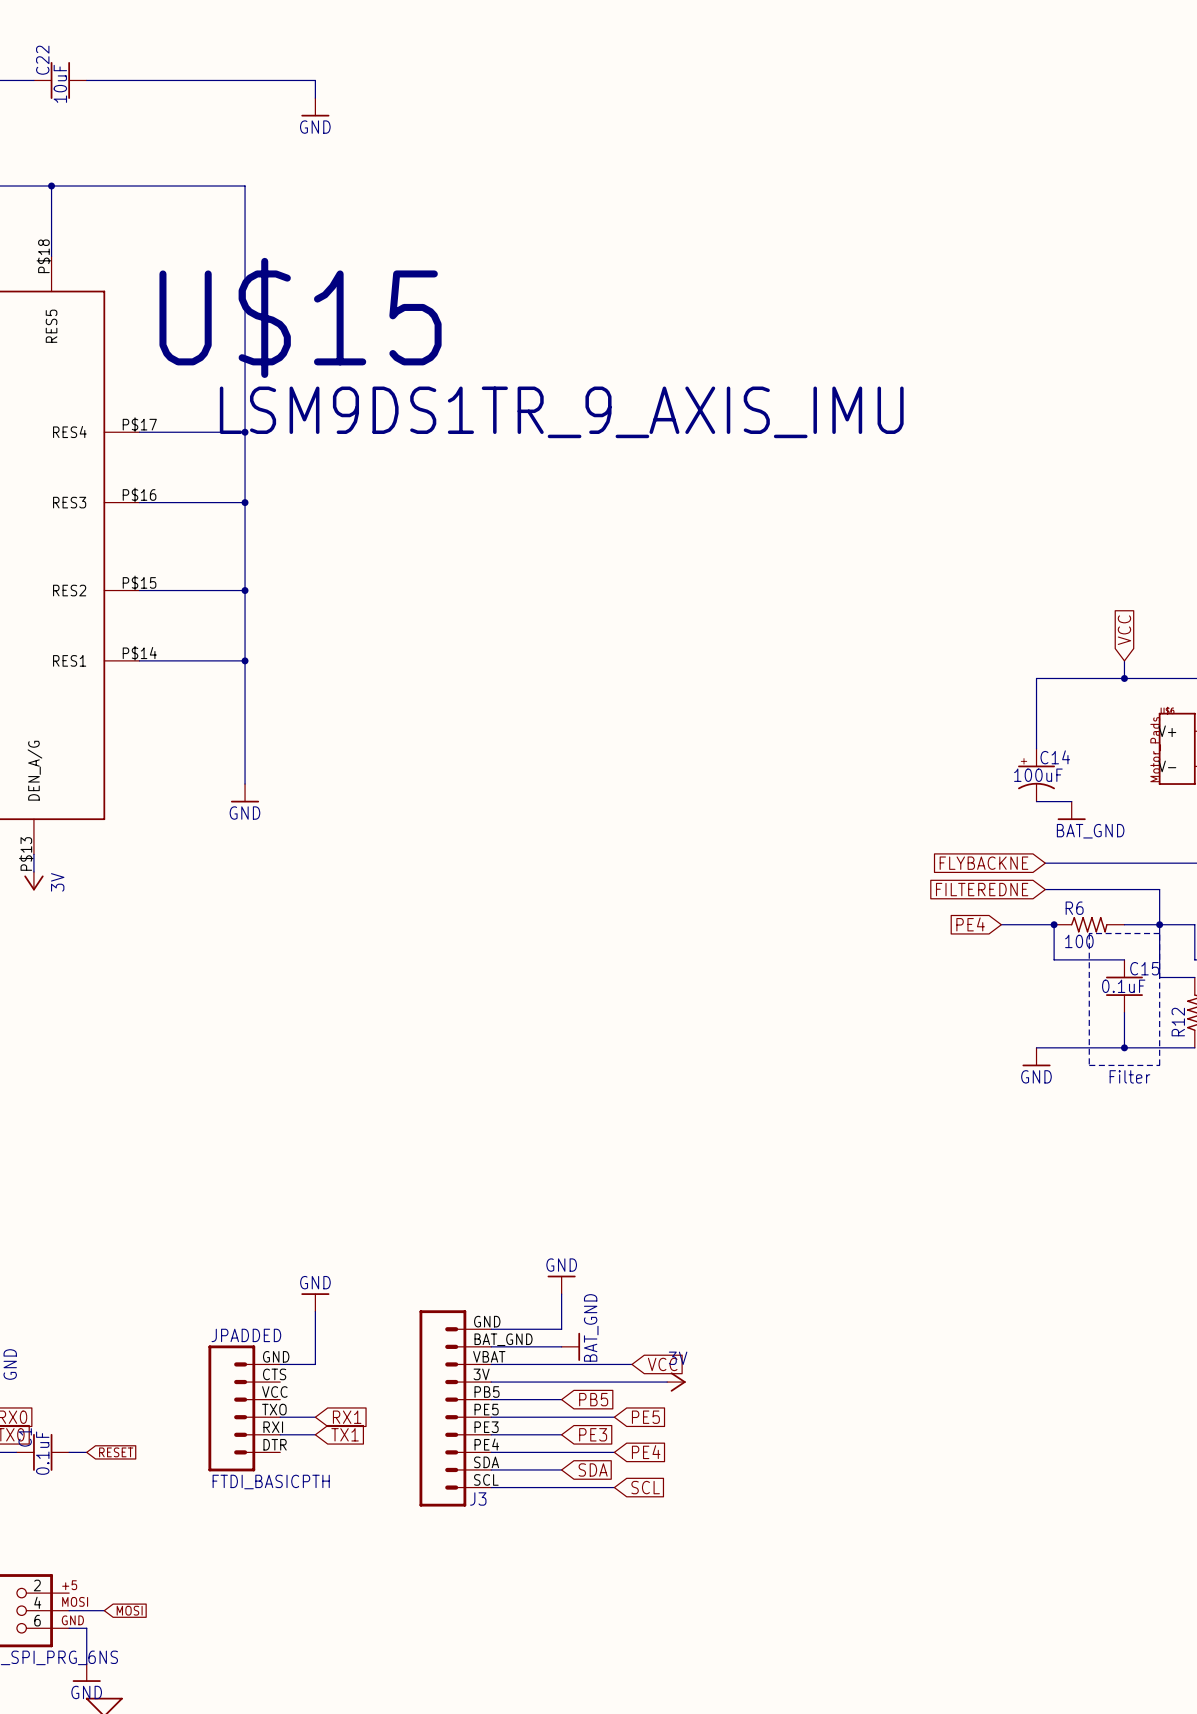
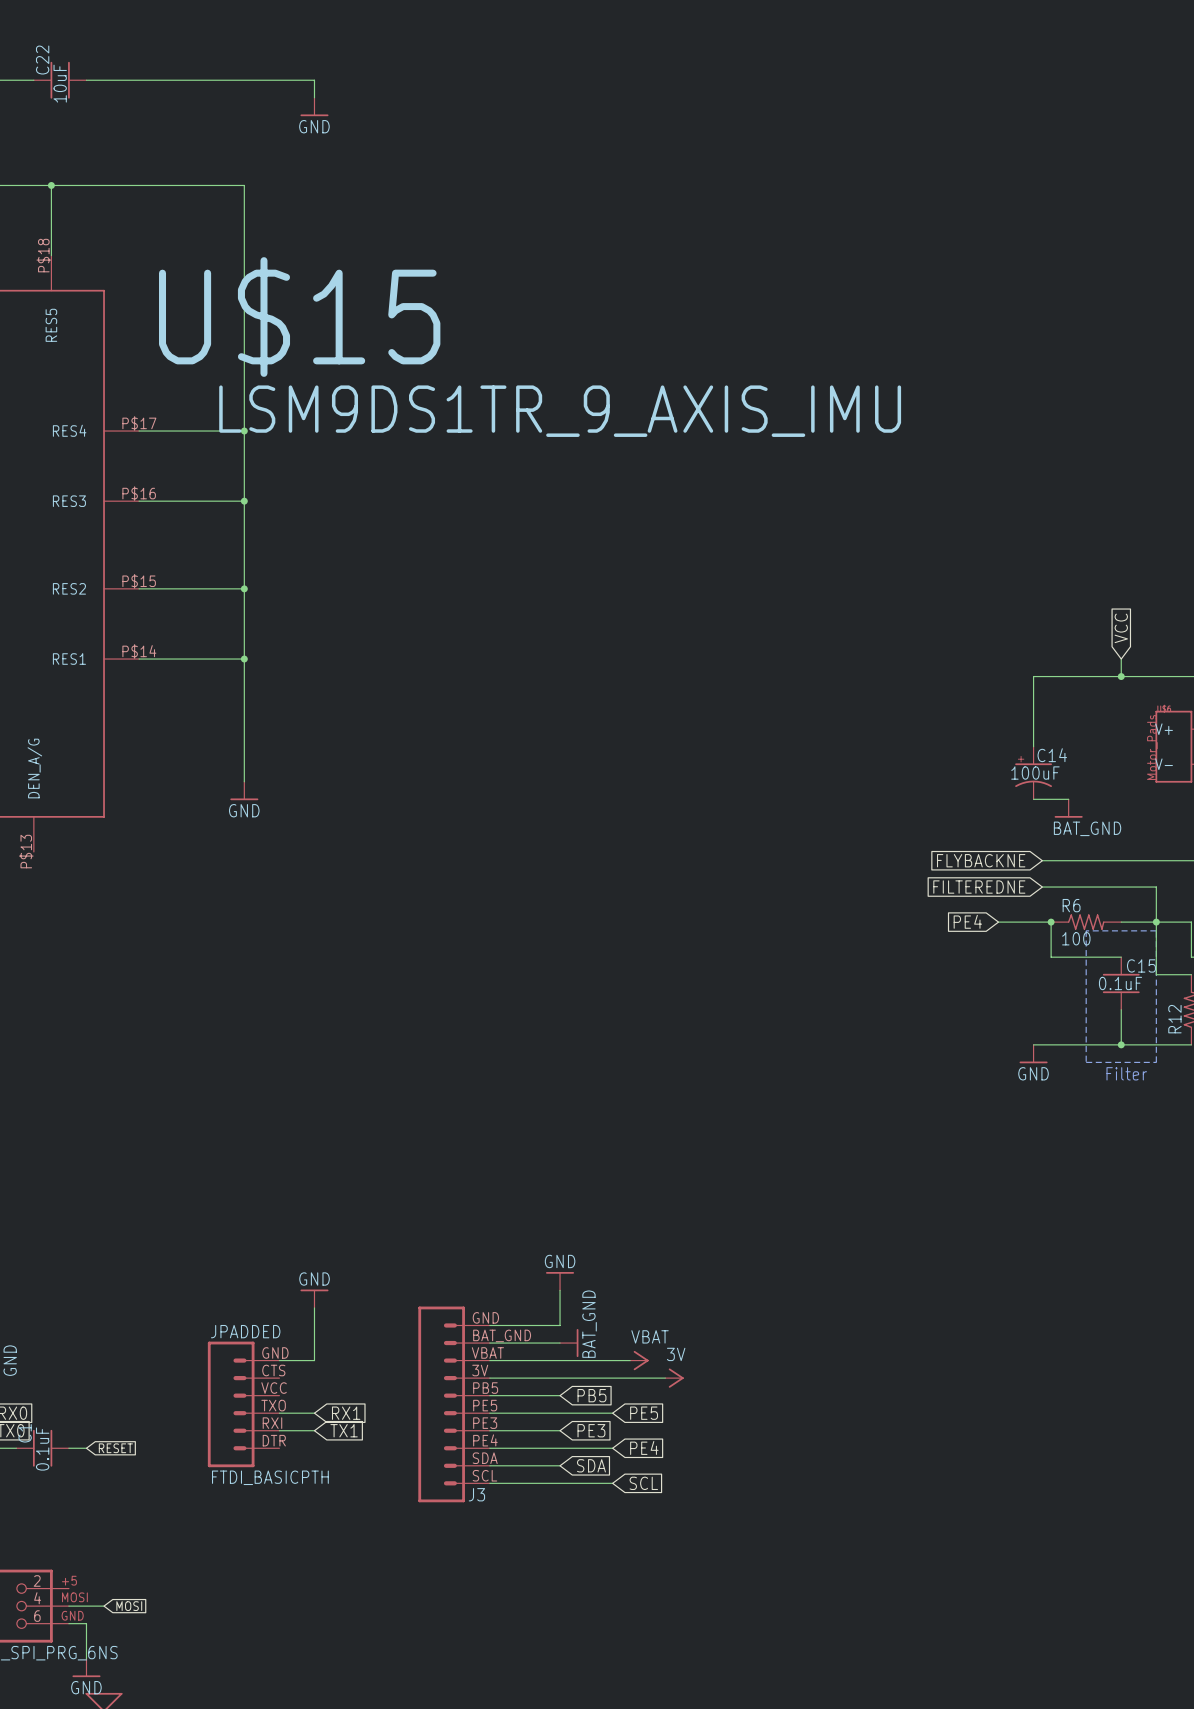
wire: (33, 854) (33, 871) -> none
power symbol: 3V (33, 881) -> none
power symbol: none -> VBAT (639, 1360)
global label: VCC (662, 1364) -> none

